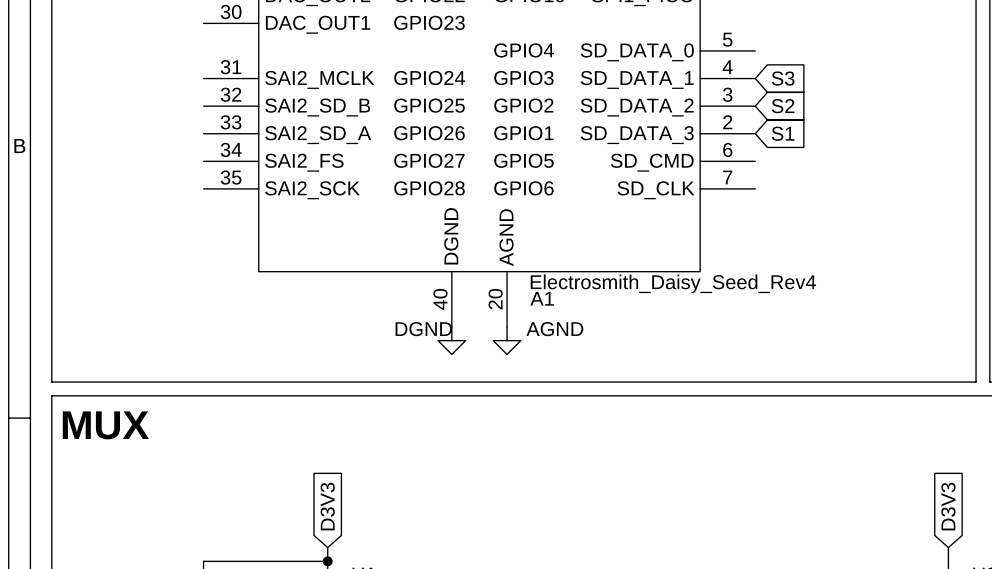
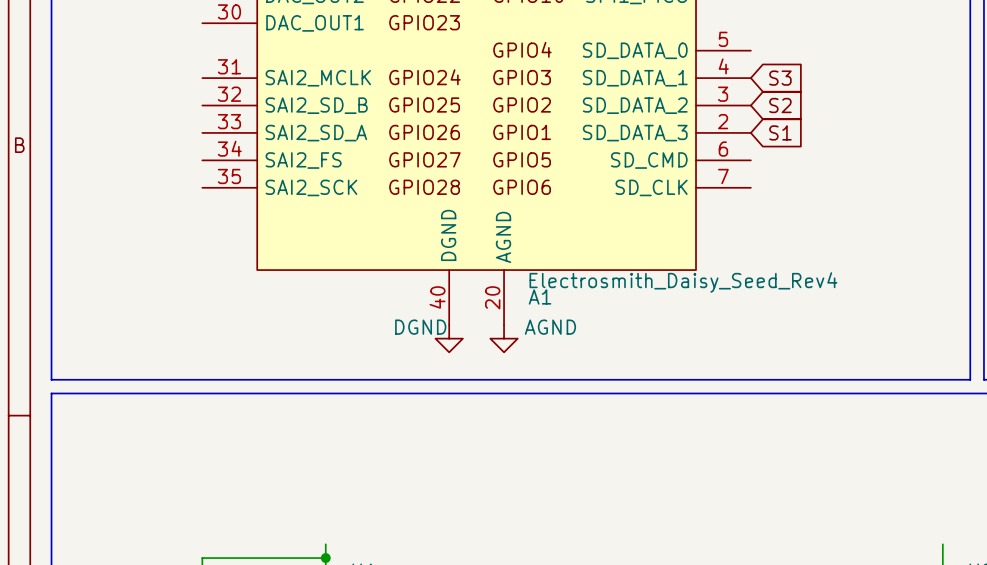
text: MUX (105, 425) -> none
global label: D3V3 (327, 506) -> none
global label: D3V3 (948, 506) -> none

